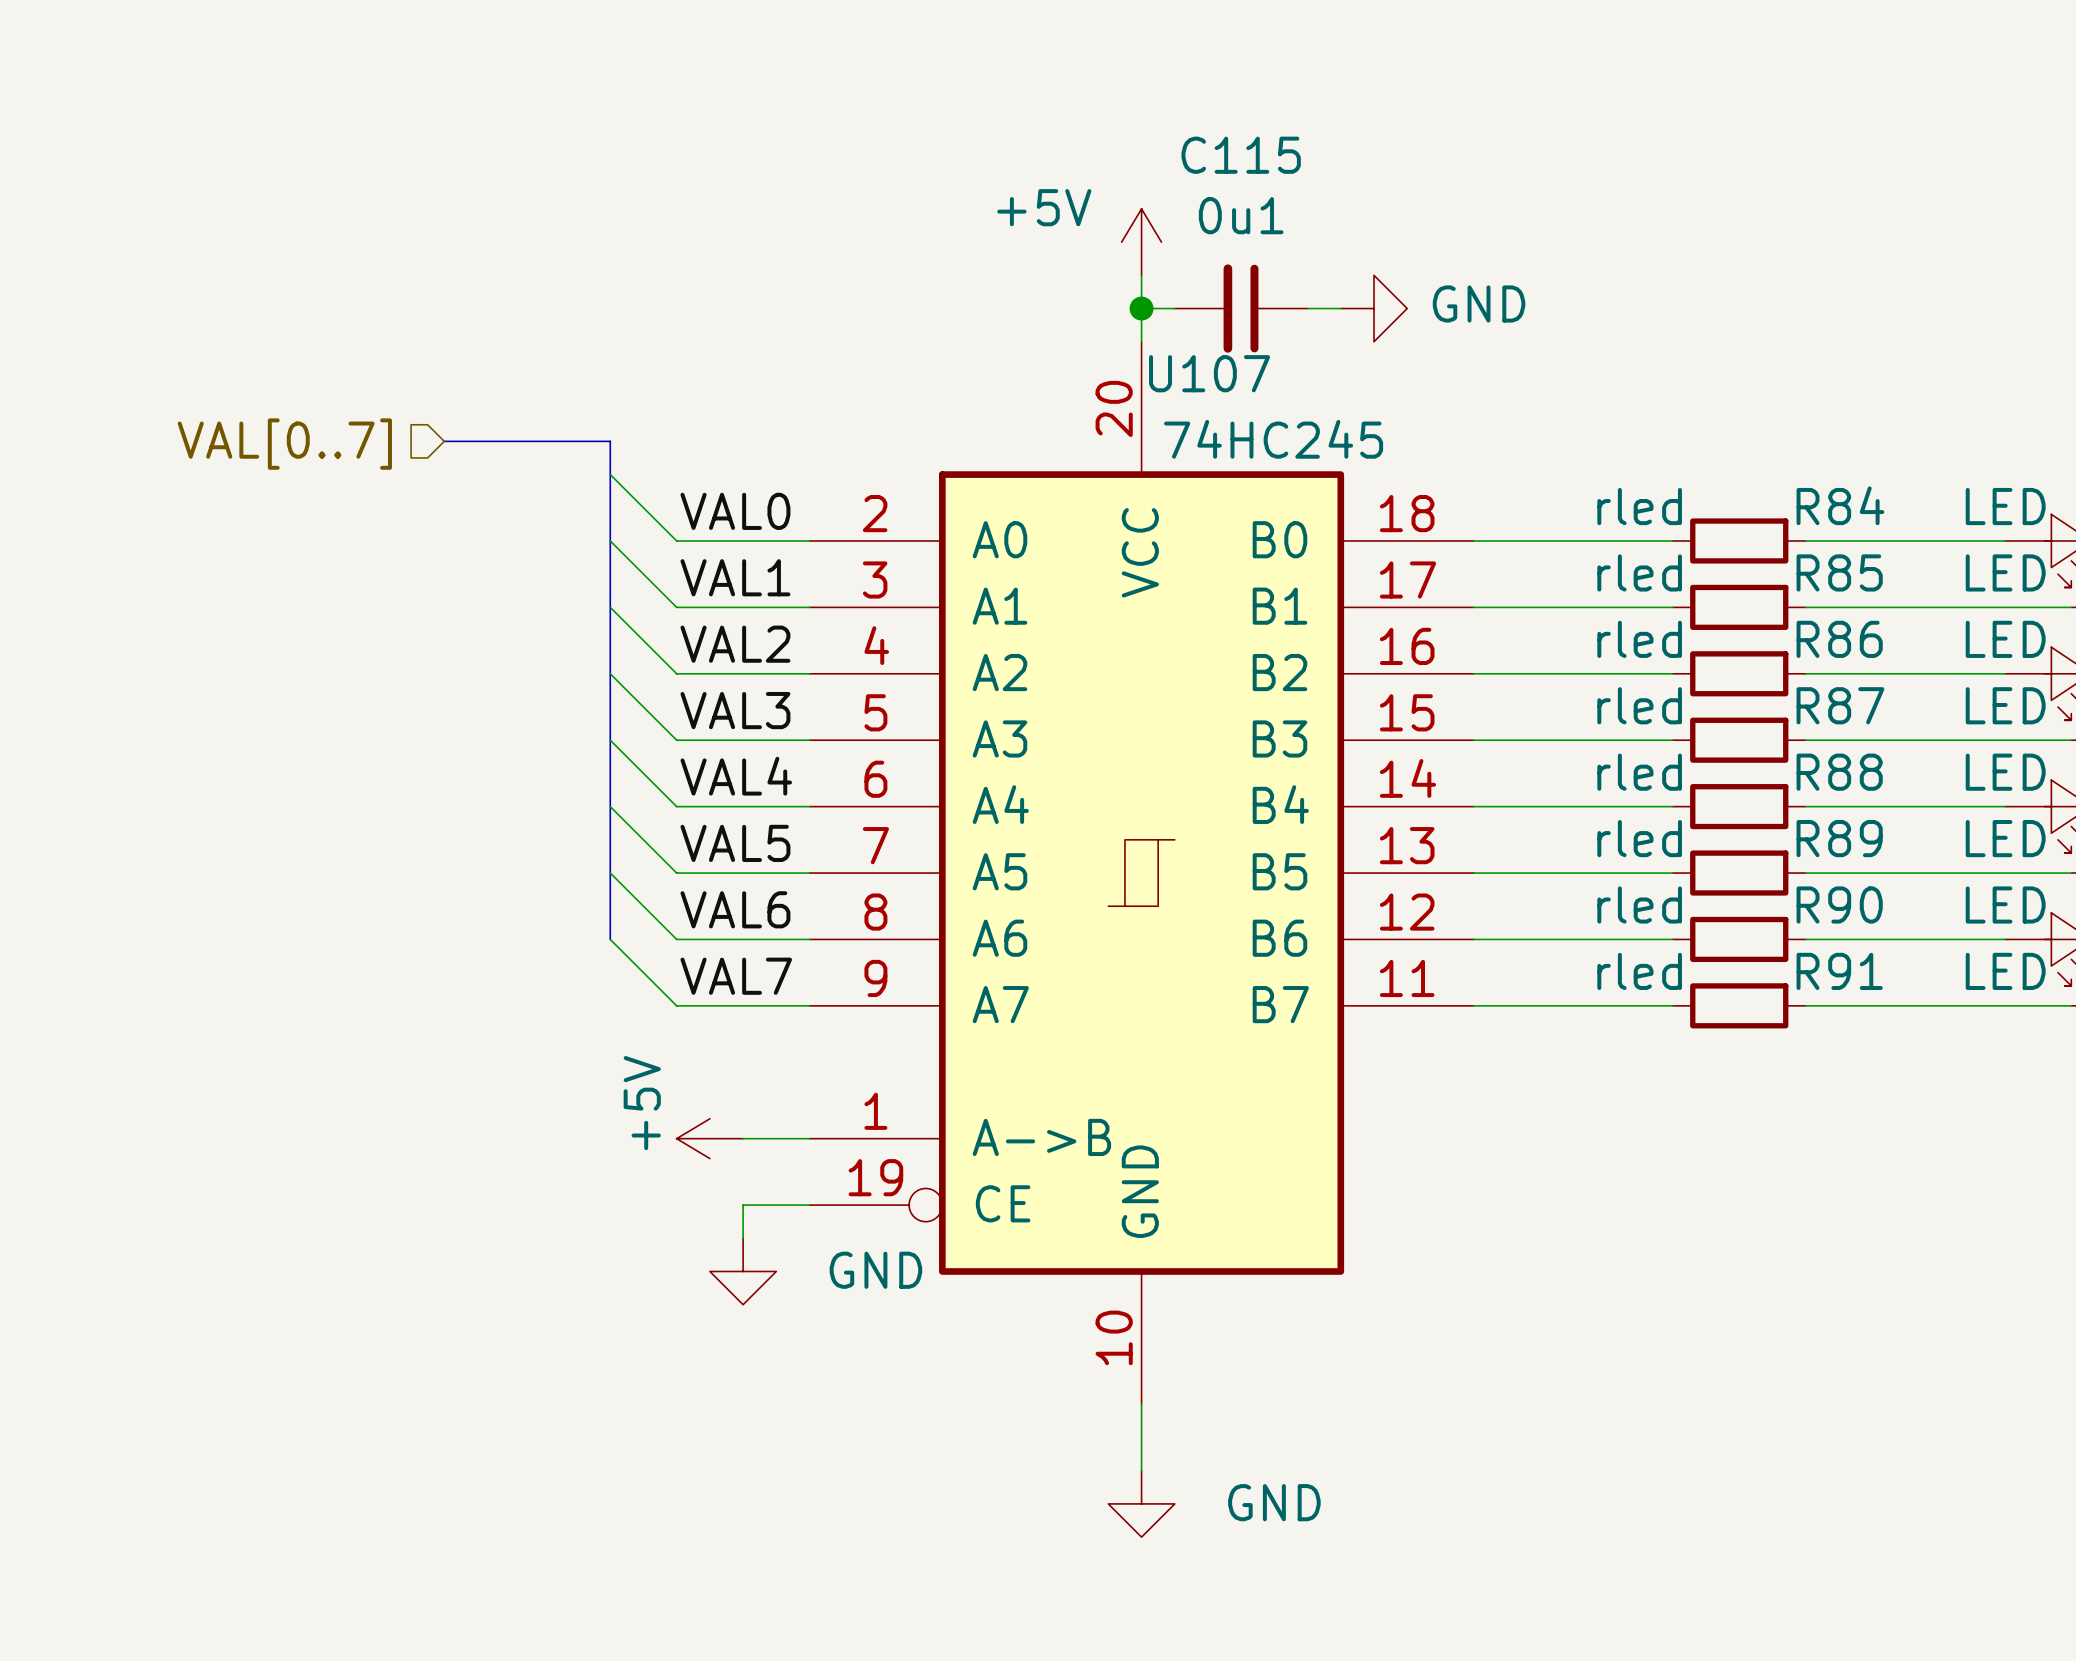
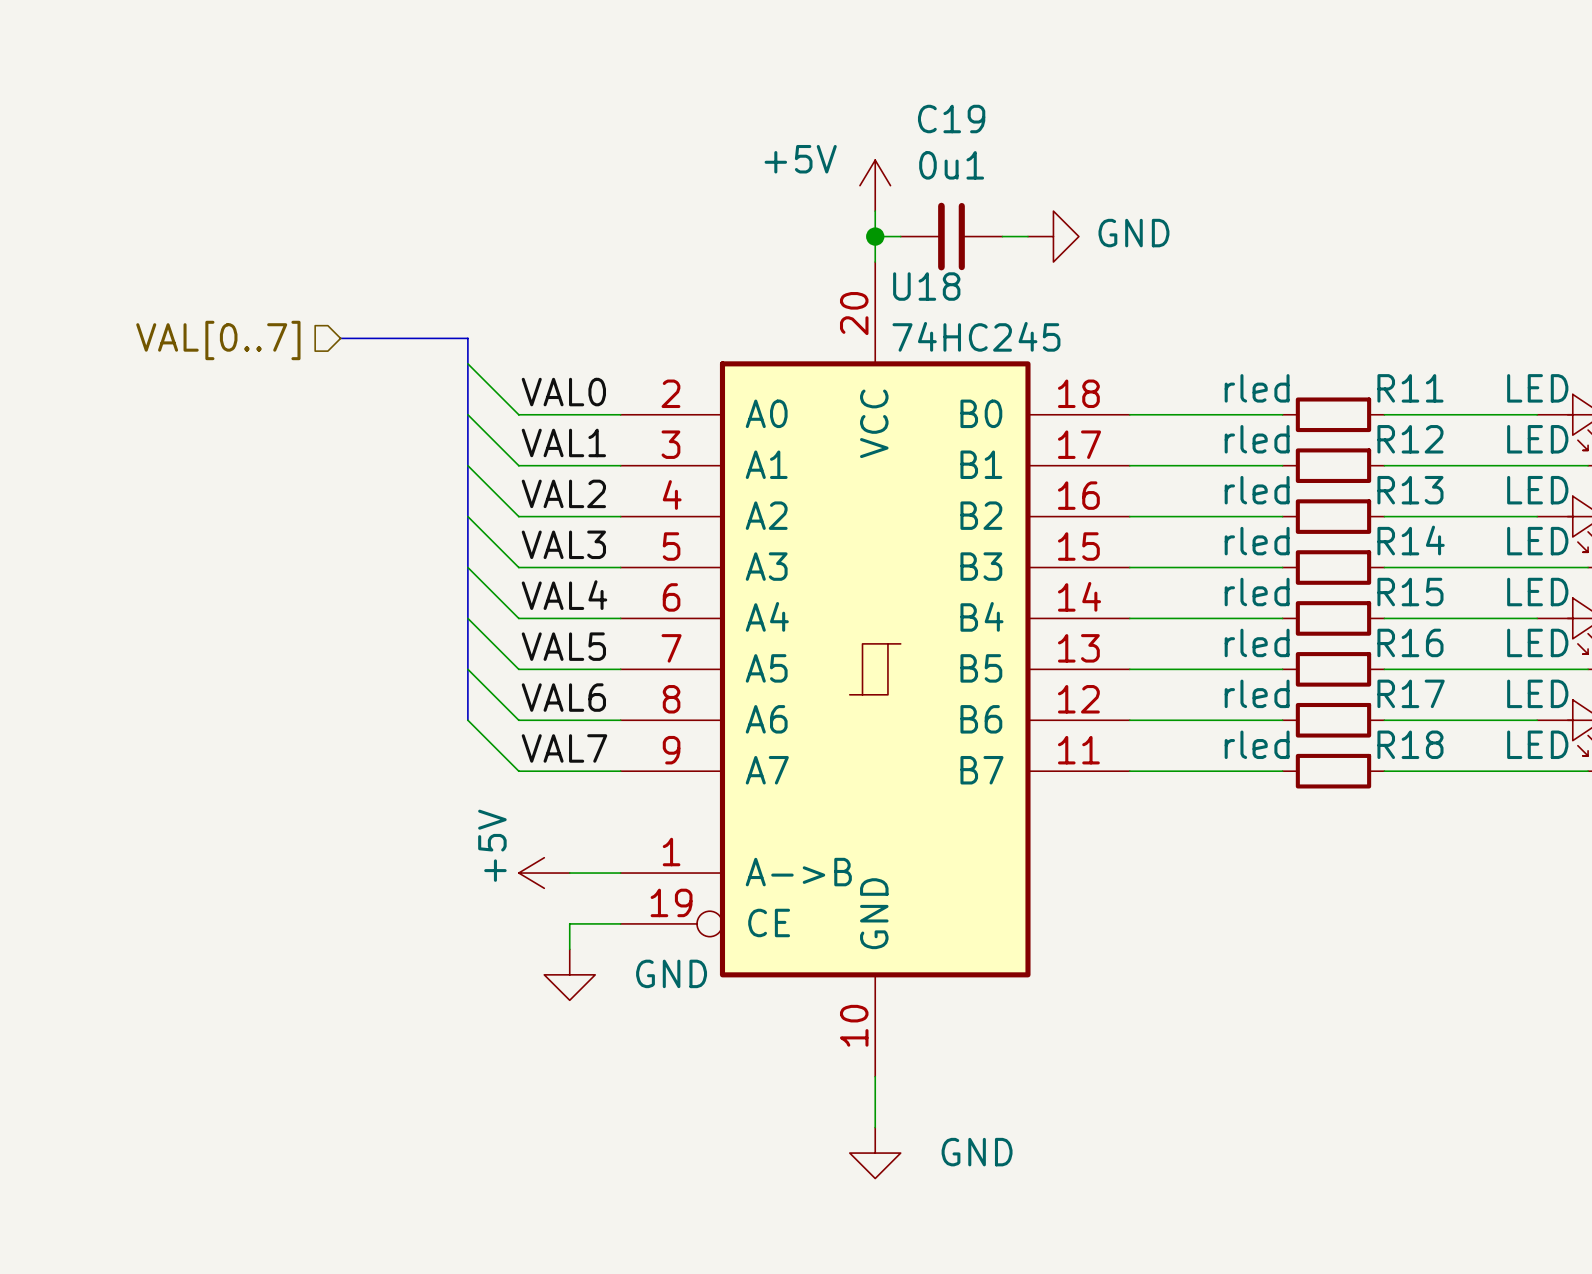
C115 name: C115 (1241, 155) -> C19 (951, 119)
U107 name: U107 (1209, 373) -> U18 (926, 286)
R84 name: R84 (1840, 505) -> R11 (1410, 388)
R85 name: R85 (1839, 572) -> R12 (1410, 439)
R86 name: R86 (1839, 639) -> R13 (1410, 490)
R87 name: R87 (1840, 705) -> R14 (1411, 540)
R88 name: R88 (1839, 772) -> R15 (1410, 592)
R89 name: R89 (1839, 838) -> R16 (1410, 642)
R90 name: R90 (1839, 904) -> R17 (1411, 693)
R91 name: R91 (1839, 971) -> R18 (1410, 744)

